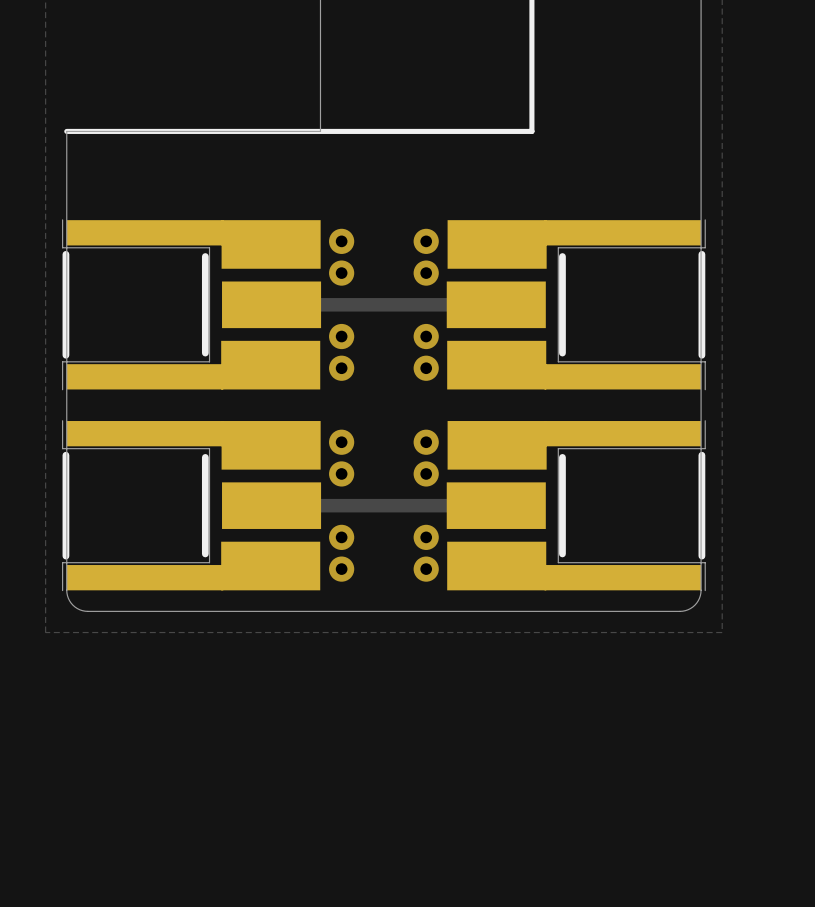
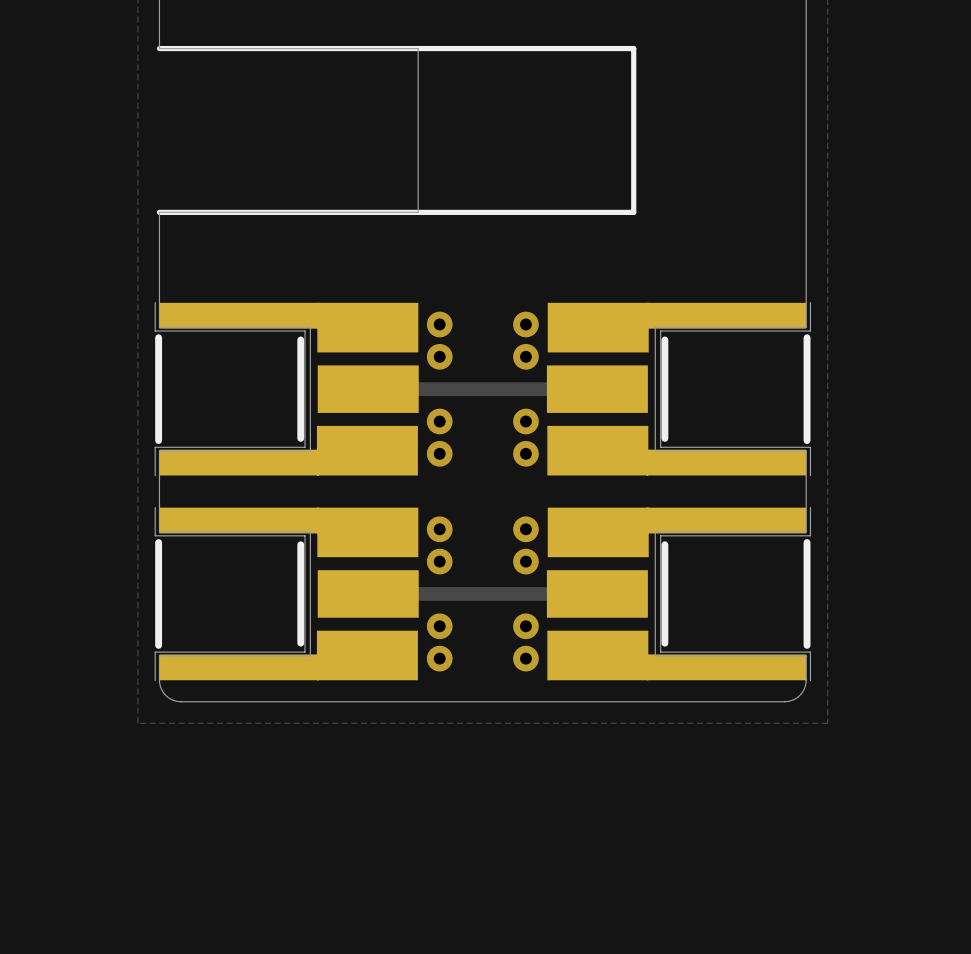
board edge: (66, 244) (66, 365) -> (159, 327) (310, 327) (310, 451) (159, 451)
board edge: (701, 244) (701, 365) -> (806, 327) (655, 327) (655, 451) (806, 451)
board edge: (66, 444) (66, 566) -> (159, 531) (310, 531) (310, 655) (159, 655)
board edge: (701, 444) (701, 566) -> (806, 531) (655, 531) (655, 655) (806, 655)

